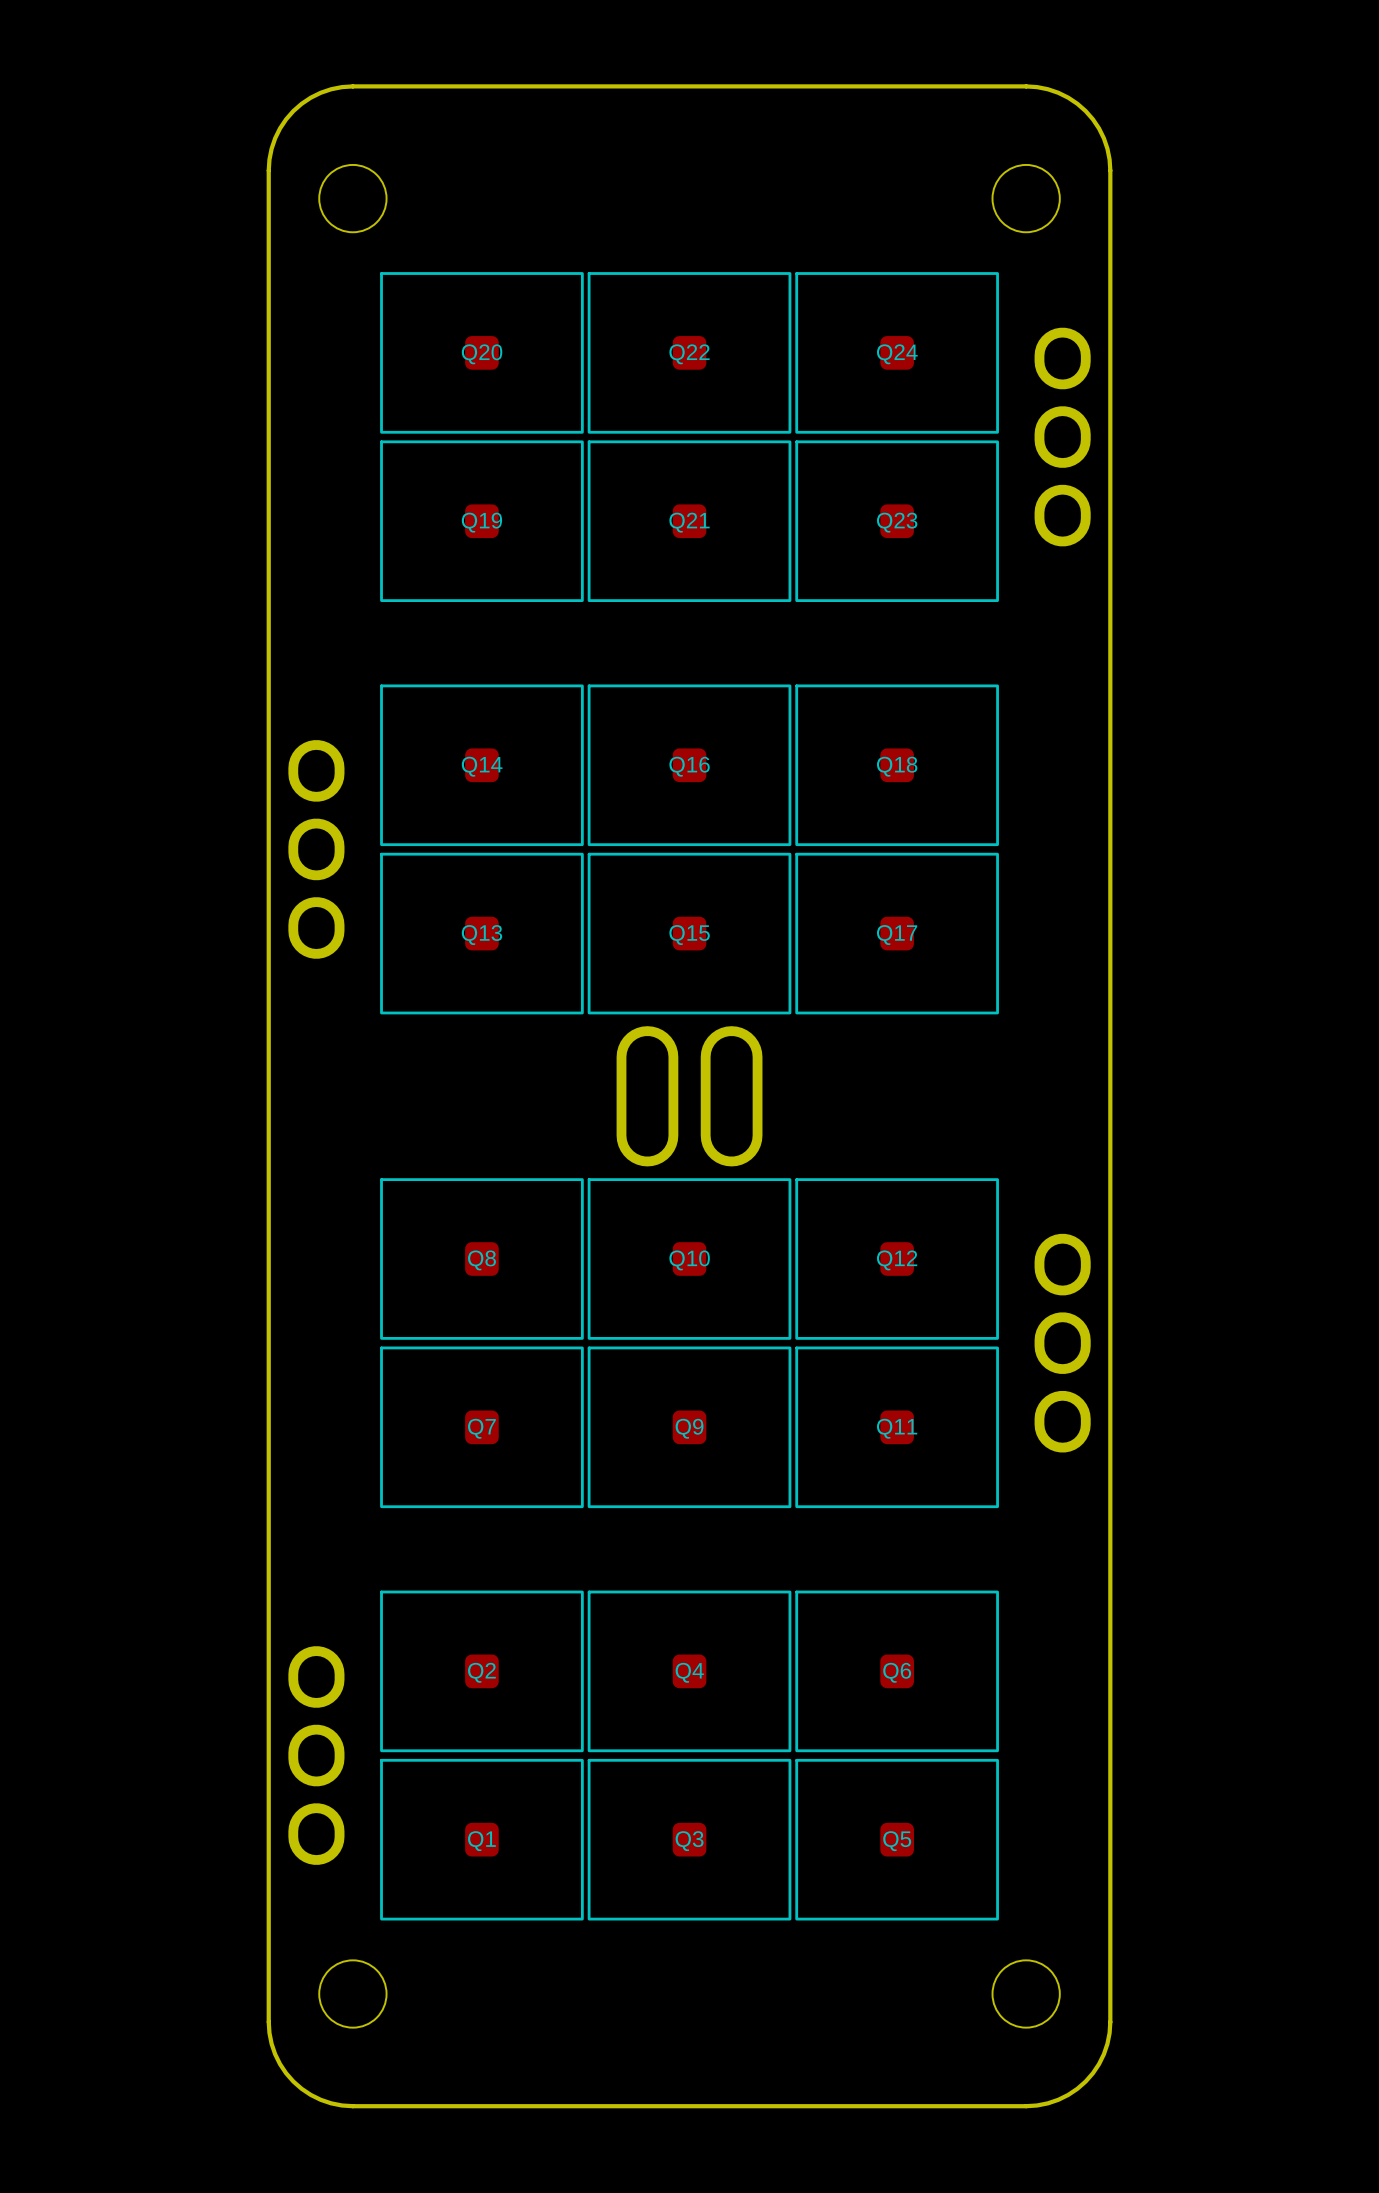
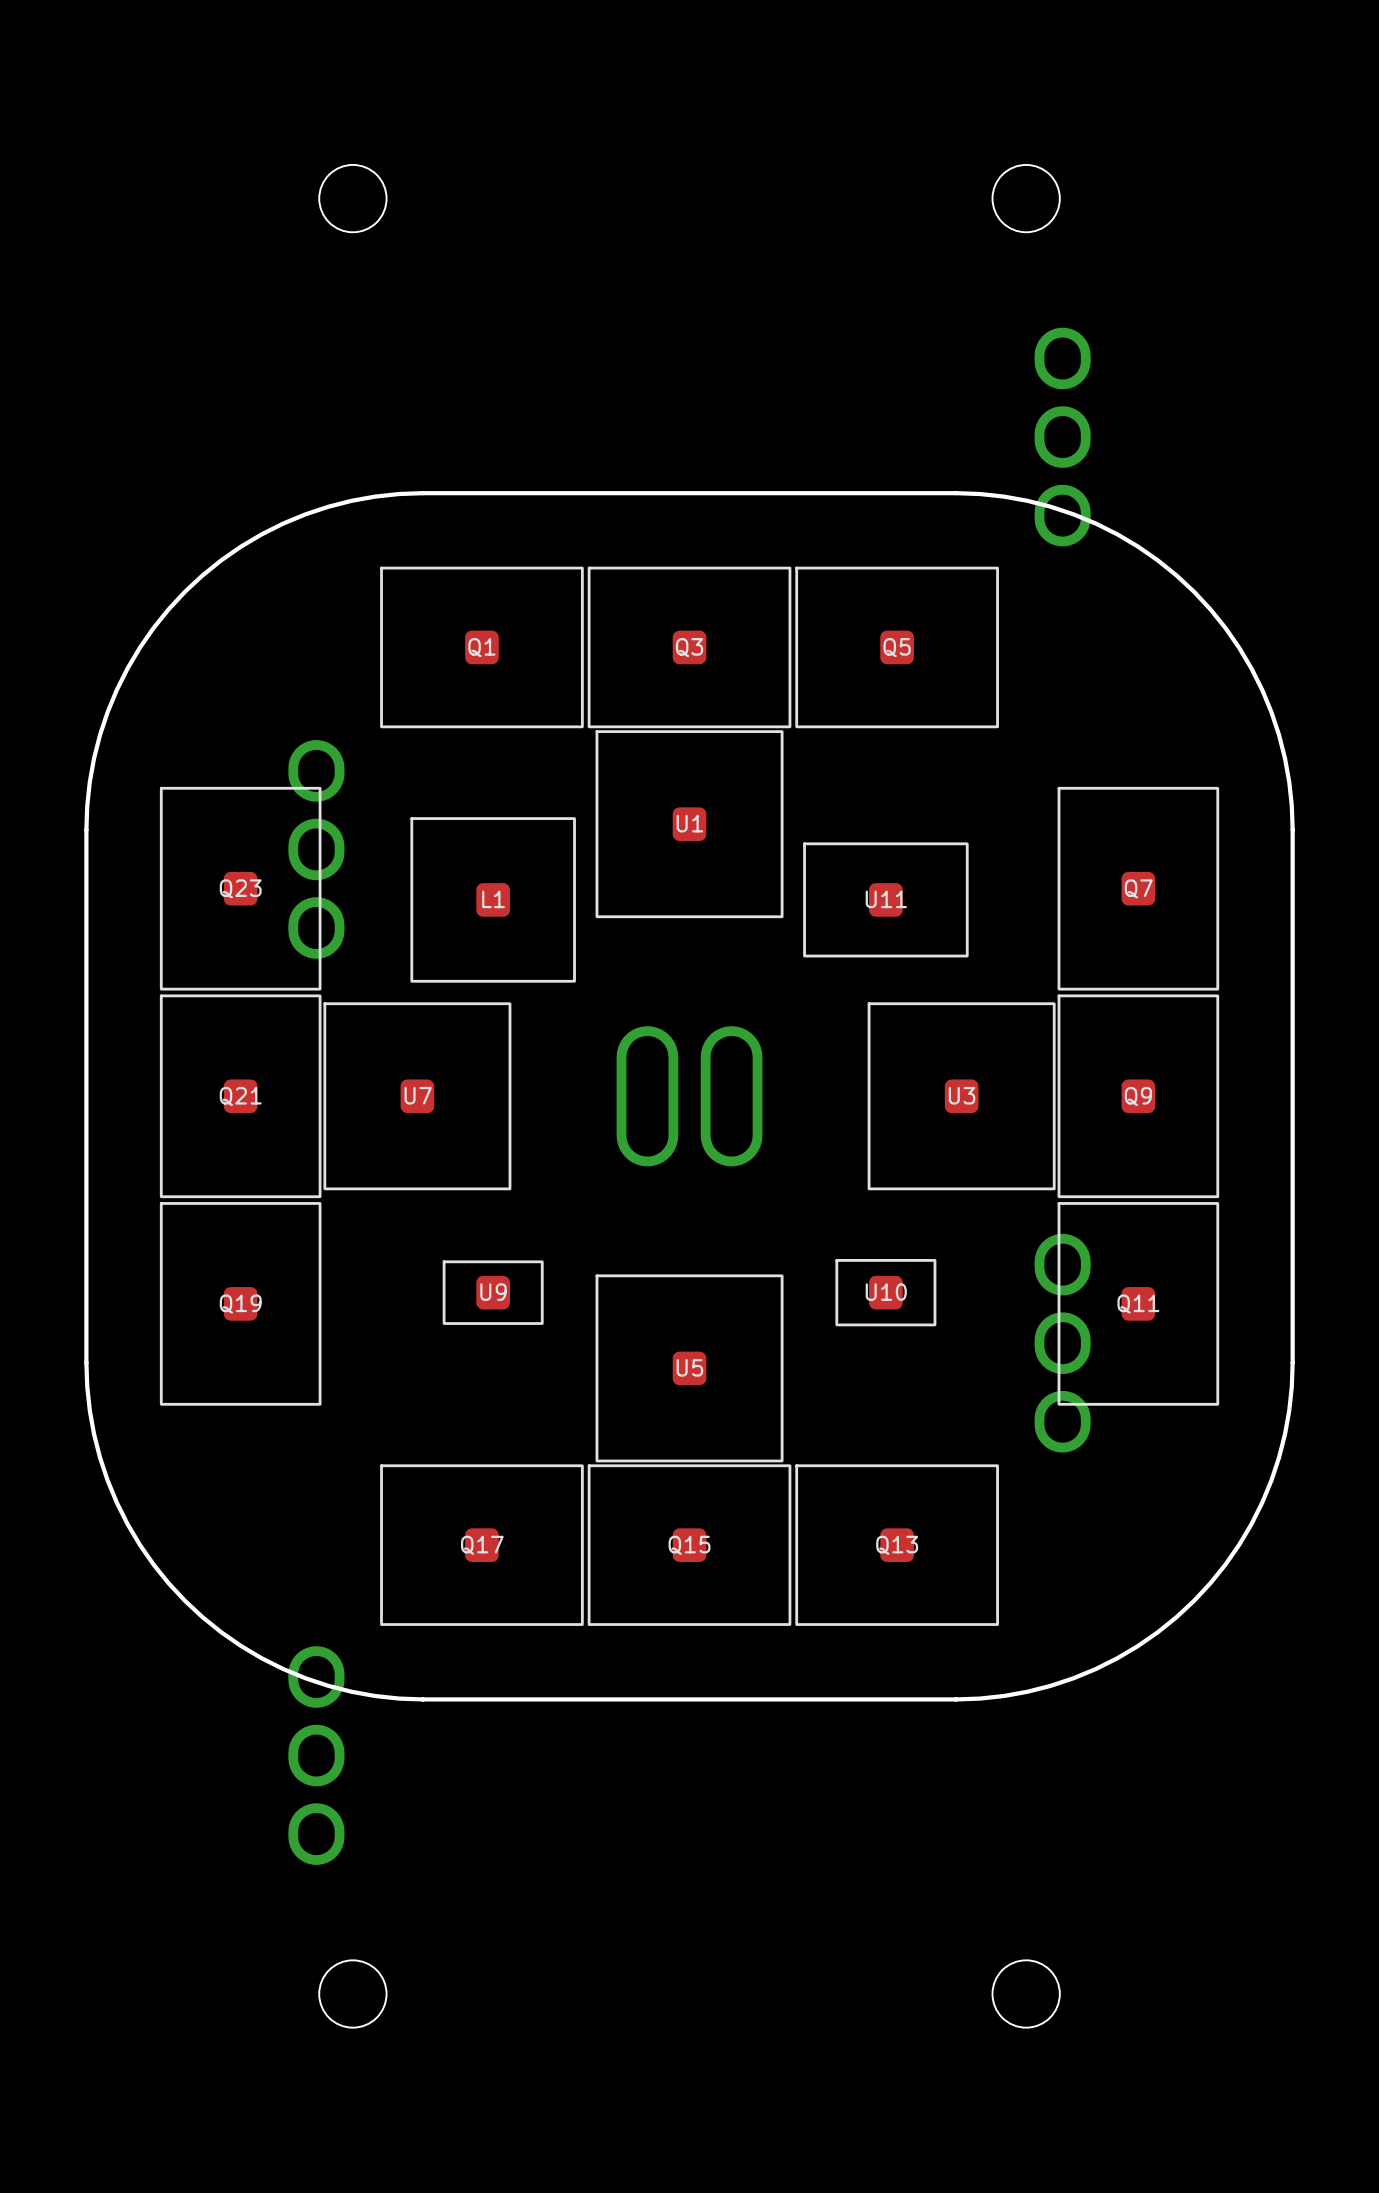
board edge: (352, 86) (1037, 87) (1058, 92) (1077, 103) (1092, 119) (1103, 138) (1110, 170) (1110, 2022) (1103, 2054) (1092, 2073) (1077, 2088) (1058, 2099) (1026, 2106) (352, 2106) (331, 2103) (310, 2094) (293, 2081) (275, 2054) (268, 2022) (268, 170) (275, 138) (293, 111) (320, 92) (352, 86) -> none
Q20: (481, 352) -> none
Q22: (689, 352) -> none
Q24: (897, 352) -> none
board edge: none -> (423, 493) (956, 493) (1003, 496) (1027, 500) (1050, 506) (1095, 523) (1138, 546) (1176, 575) (1194, 591) (1225, 628) (1239, 647) (1262, 689) (1279, 734) (1289, 781) (1291, 805) (1291, 1386) (1289, 1410) (1279, 1457) (1262, 1502) (1251, 1524) (1225, 1564) (1194, 1600) (1157, 1632) (1138, 1645) (1095, 1669) (1050, 1685) (1003, 1696) (980, 1698) (399, 1698) (375, 1696) (328, 1685) (283, 1669) (261, 1658) (221, 1632) (185, 1600) (153, 1564) (139, 1544) (116, 1502) (100, 1457) (89, 1410) (87, 1386) (86, 829) (89, 781) (100, 734) (116, 689) (139, 647) (168, 609) (185, 591) (221, 560) (241, 546) (283, 523) (328, 506) (375, 496) (423, 493)
Q19 rotation: 0° (481, 521) -> 90° clockwise (240, 1303)
Q19 position: (481, 521) -> (240, 1303)
Q21 rotation: 0° (689, 521) -> 90° clockwise (240, 1096)
Q21 position: (689, 521) -> (240, 1096)
Q23 rotation: 0° (897, 521) -> 90° clockwise (240, 888)
Q23 position: (897, 521) -> (240, 888)
Q14: (481, 765) -> none
Q16: (689, 765) -> none
Q18: (897, 765) -> none
U1: none -> (689, 824)
L1: none -> (493, 899)
U11: none -> (885, 899)
Q13 position: (481, 933) -> (897, 1545)
Q15 position: (689, 933) -> (689, 1545)
Q17 position: (897, 933) -> (481, 1545)
U7: none -> (417, 1096)
U3: none -> (961, 1096)
Q8: (481, 1259) -> none
Q10: (689, 1259) -> none
Q12: (897, 1259) -> none
U9: none -> (493, 1292)
U10: none -> (885, 1292)
U5: none -> (689, 1368)
Q7 rotation: 0° (481, 1427) -> 90° clockwise (1138, 888)
Q7 position: (481, 1427) -> (1138, 888)
Q9 rotation: 0° (689, 1427) -> 90° clockwise (1138, 1096)
Q9 position: (689, 1427) -> (1138, 1096)
Q11 rotation: 0° (897, 1427) -> 90° clockwise (1138, 1303)
Q11 position: (897, 1427) -> (1138, 1303)
Q2: (481, 1671) -> none
Q4: (689, 1671) -> none
Q6: (897, 1671) -> none
Q1 position: (481, 1839) -> (481, 647)
Q3 position: (689, 1839) -> (689, 647)
Q5 position: (897, 1839) -> (897, 647)

